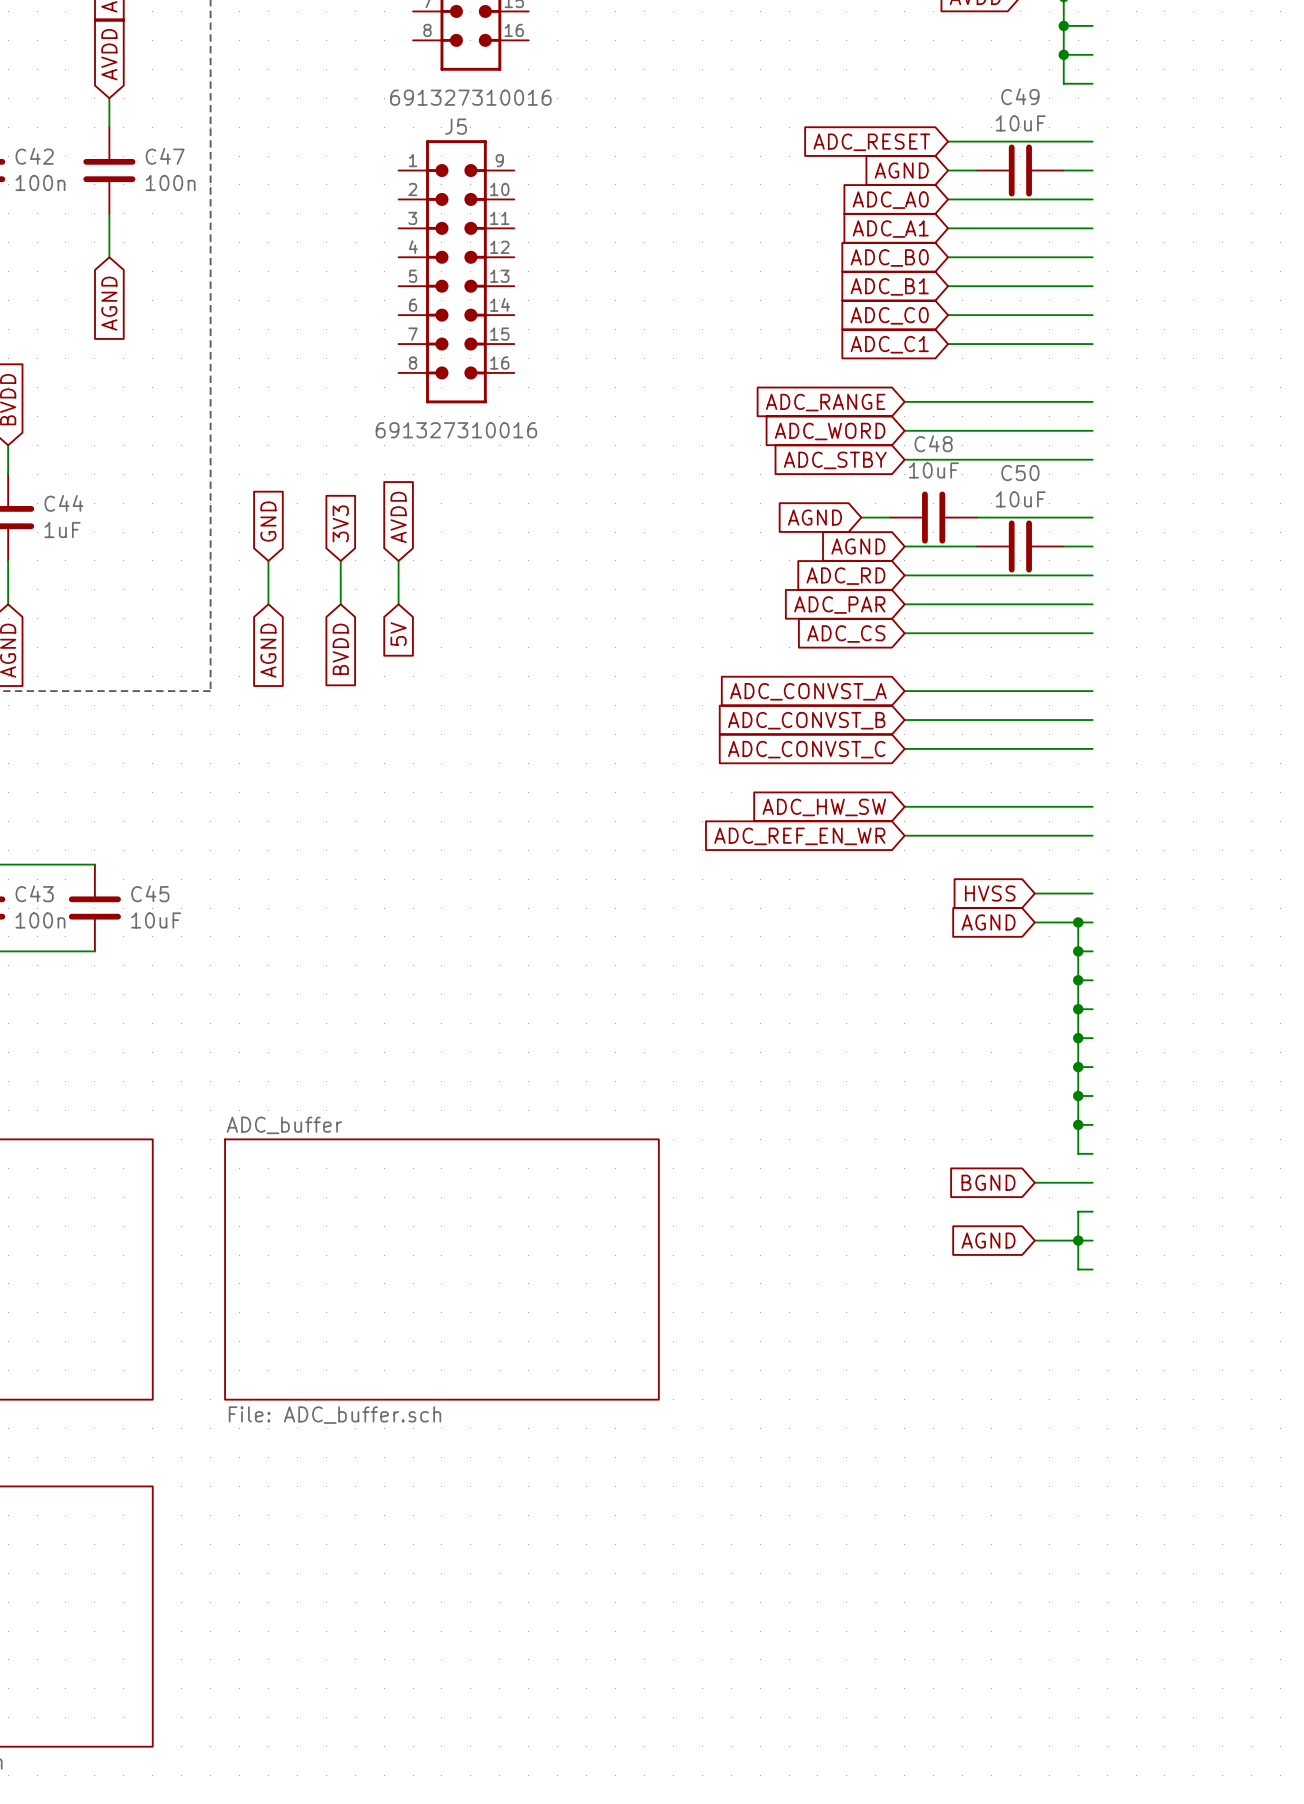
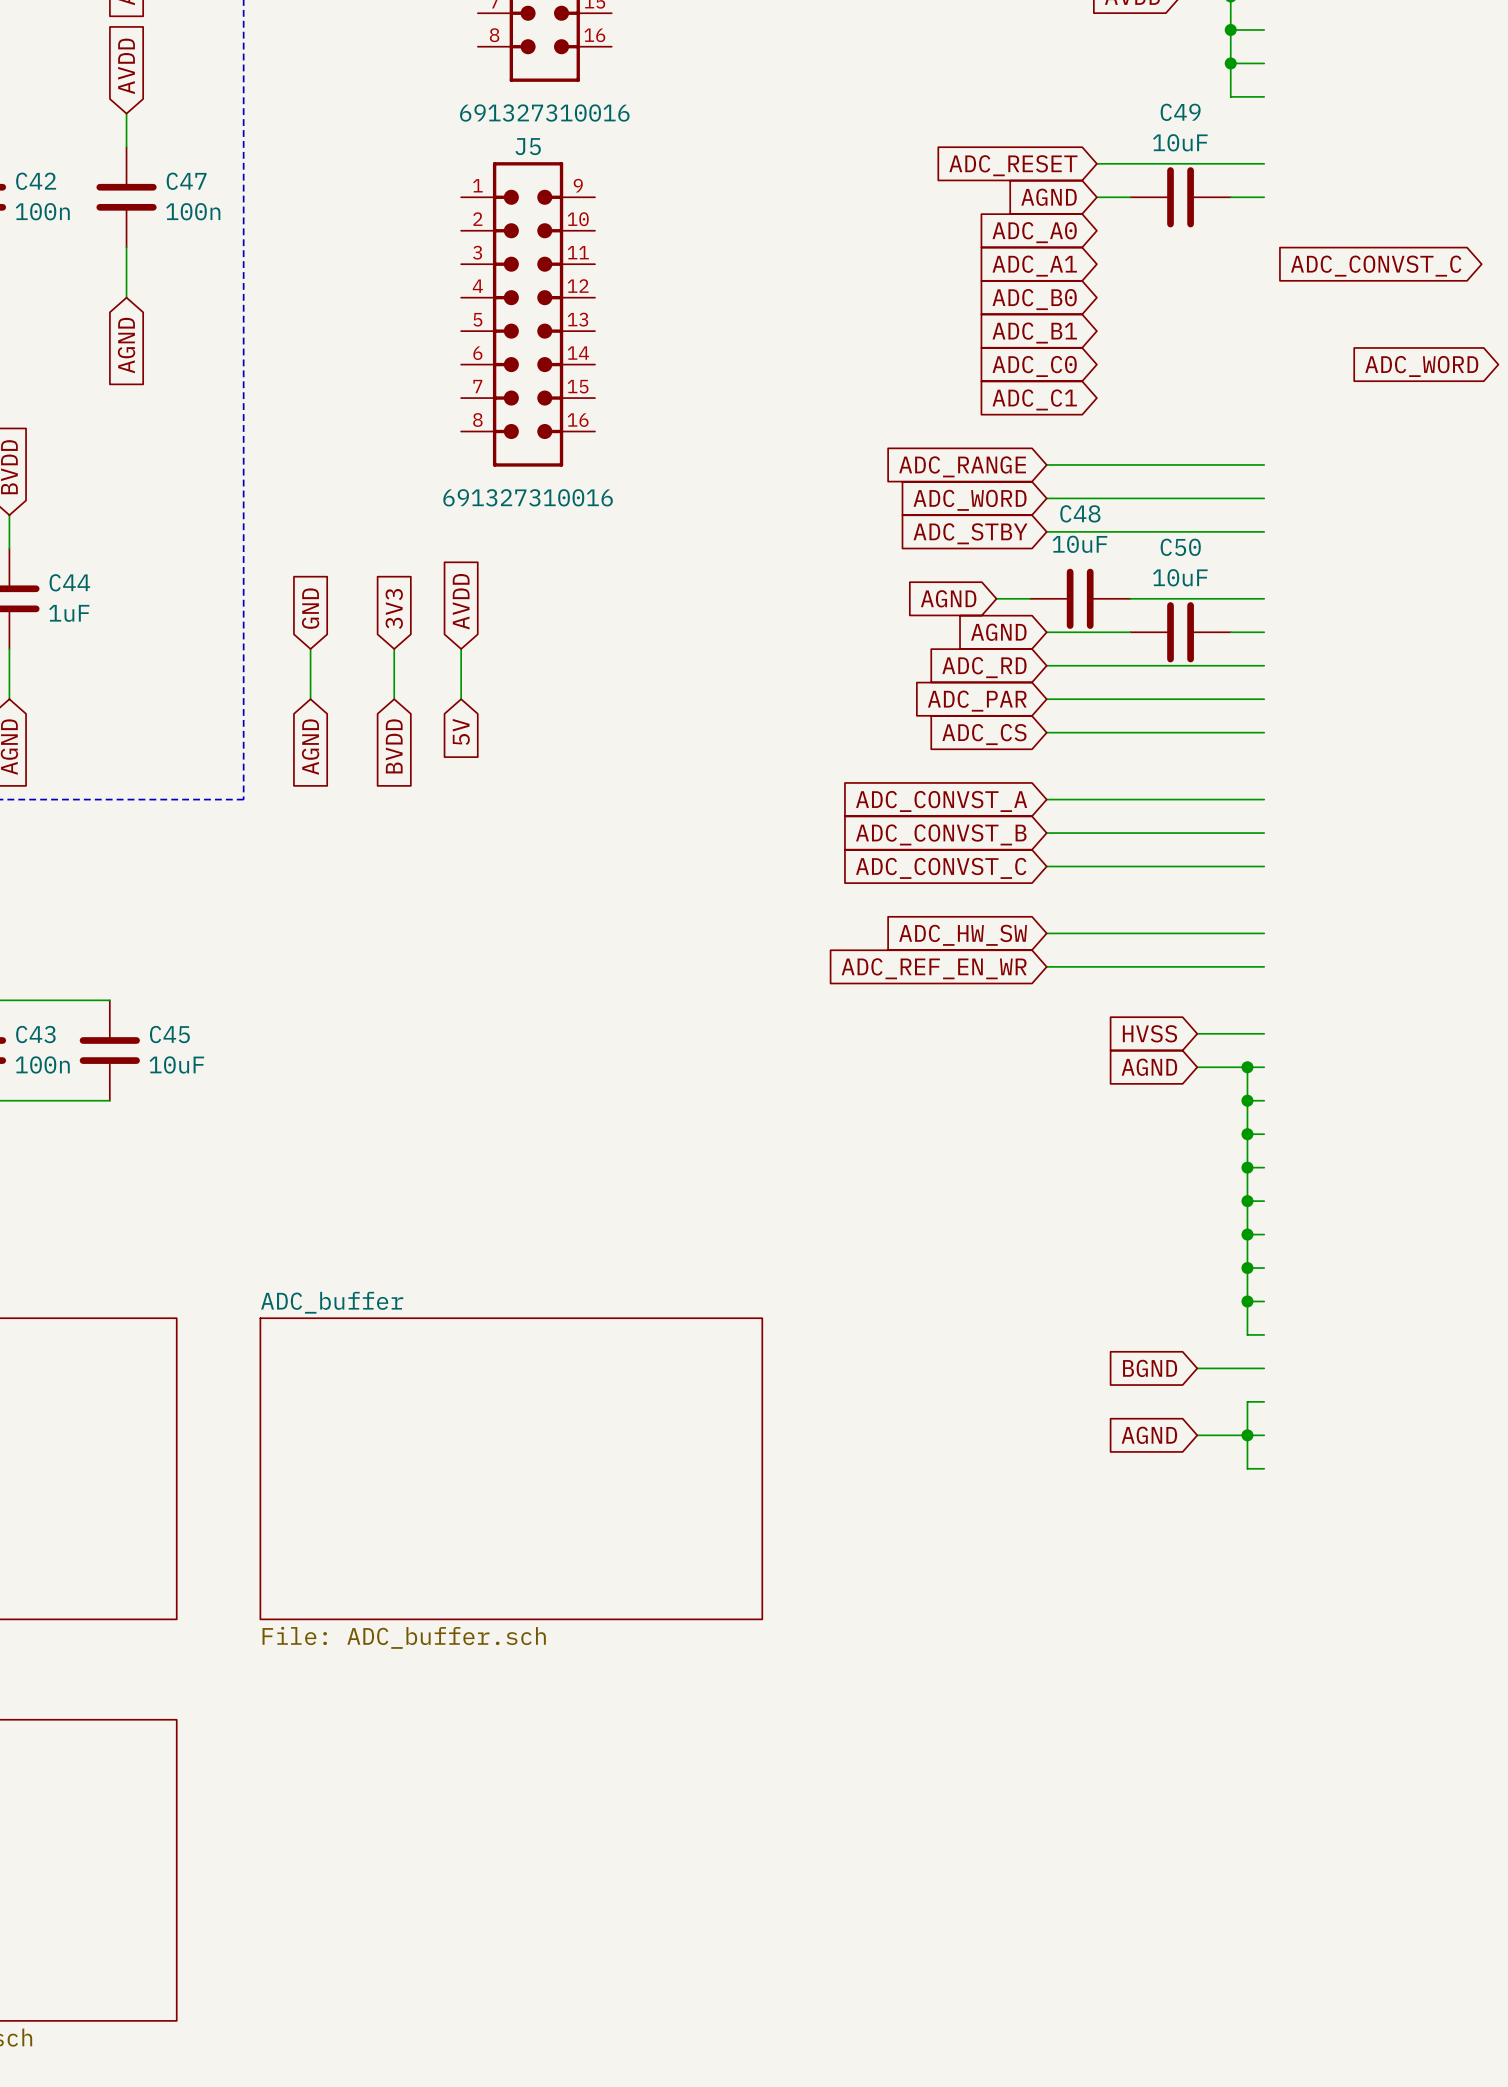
wire: (948, 199) (1092, 199) -> none
wire: (948, 228) (1092, 228) -> none
global label: none -> ADC_CONVST_C (1376, 266)
wire: (948, 257) (1092, 257) -> none
wire: (948, 286) (1092, 286) -> none
wire: (948, 315) (1092, 315) -> none
global label: none -> ADC_WORD (1421, 366)
wire: (948, 344) (1092, 344) -> none

